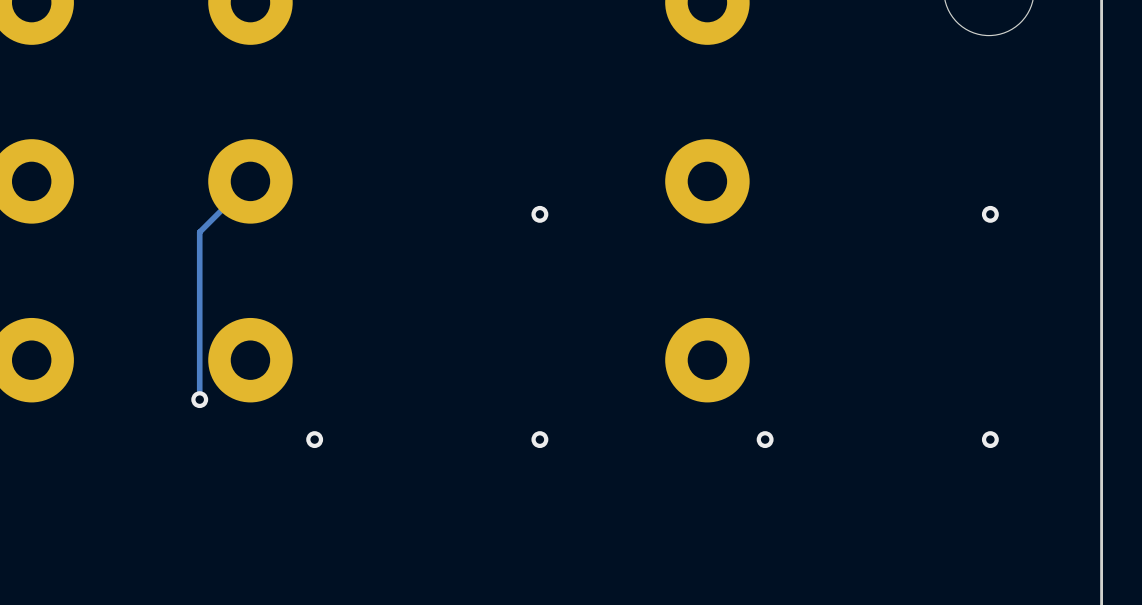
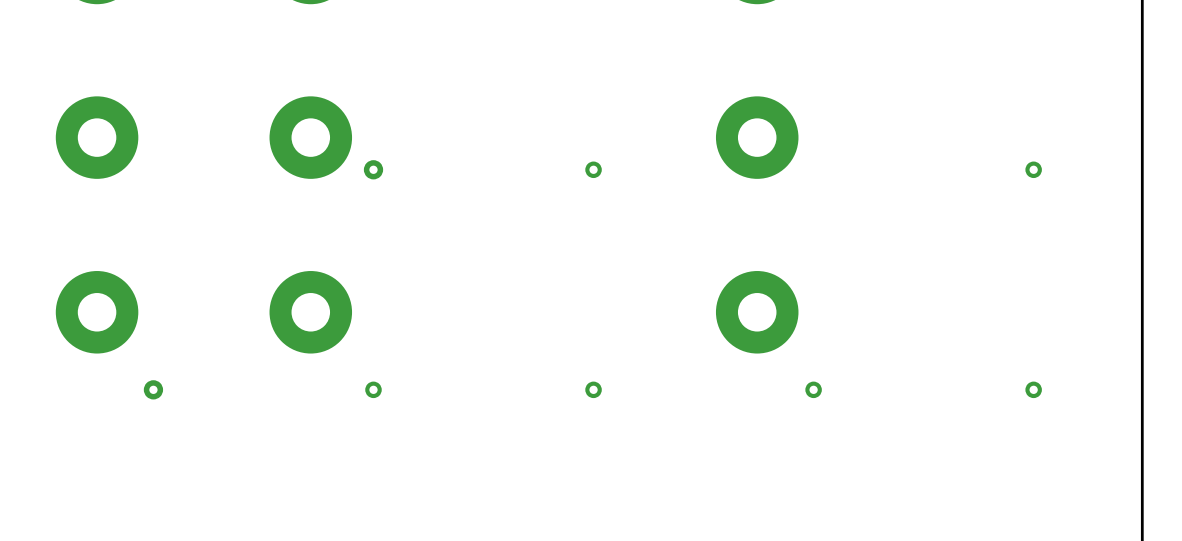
track: (250, 181) (199, 232) (199, 399) -> none
via: none -> (373, 169)
via: (199, 399) -> none
via: none -> (153, 389)

